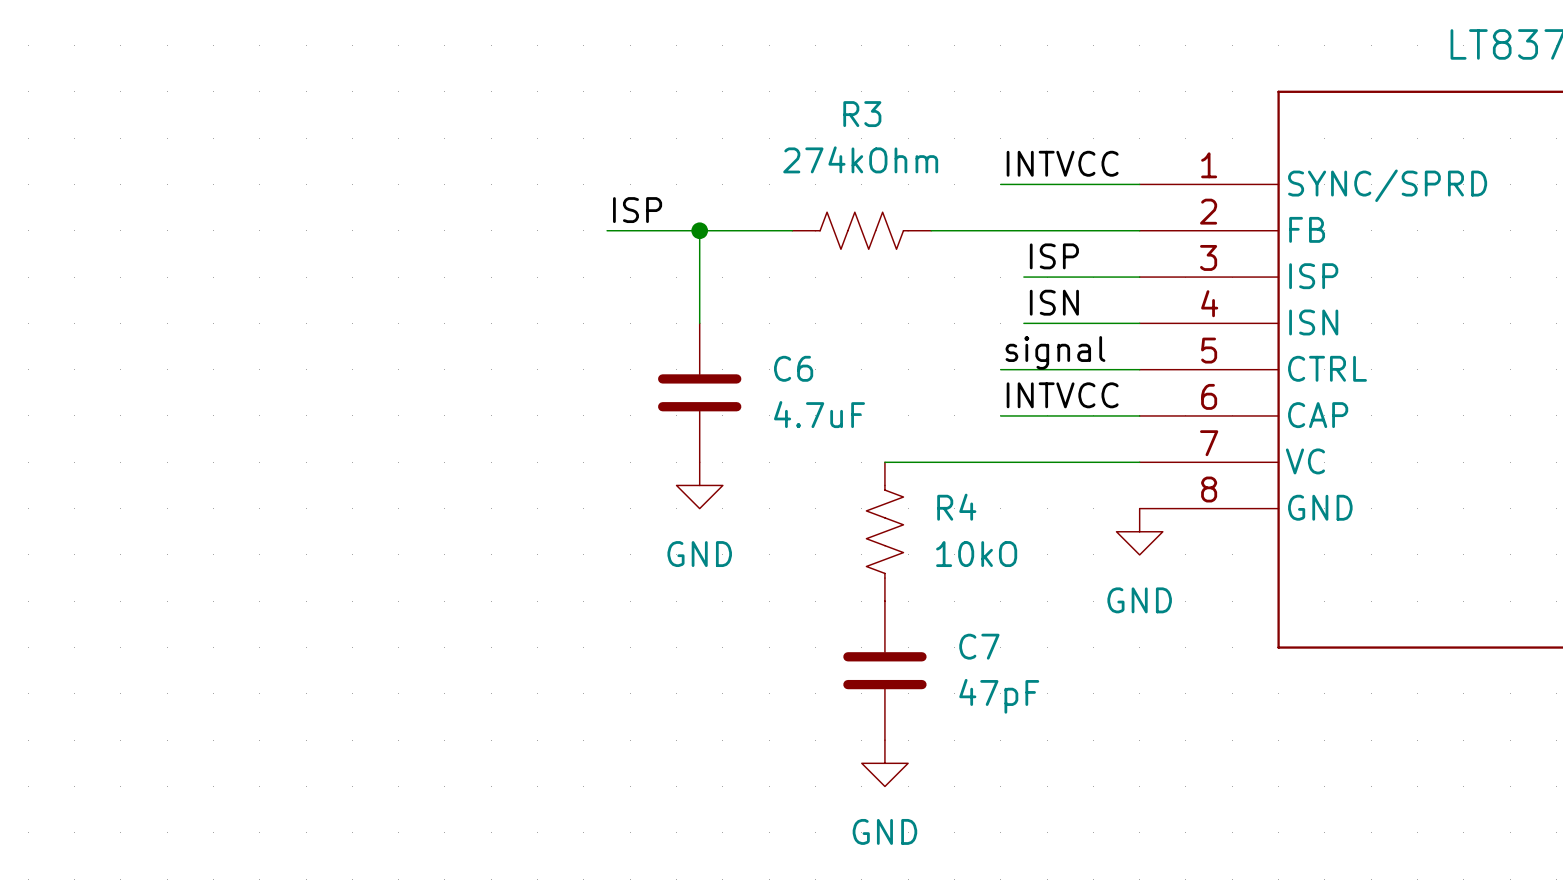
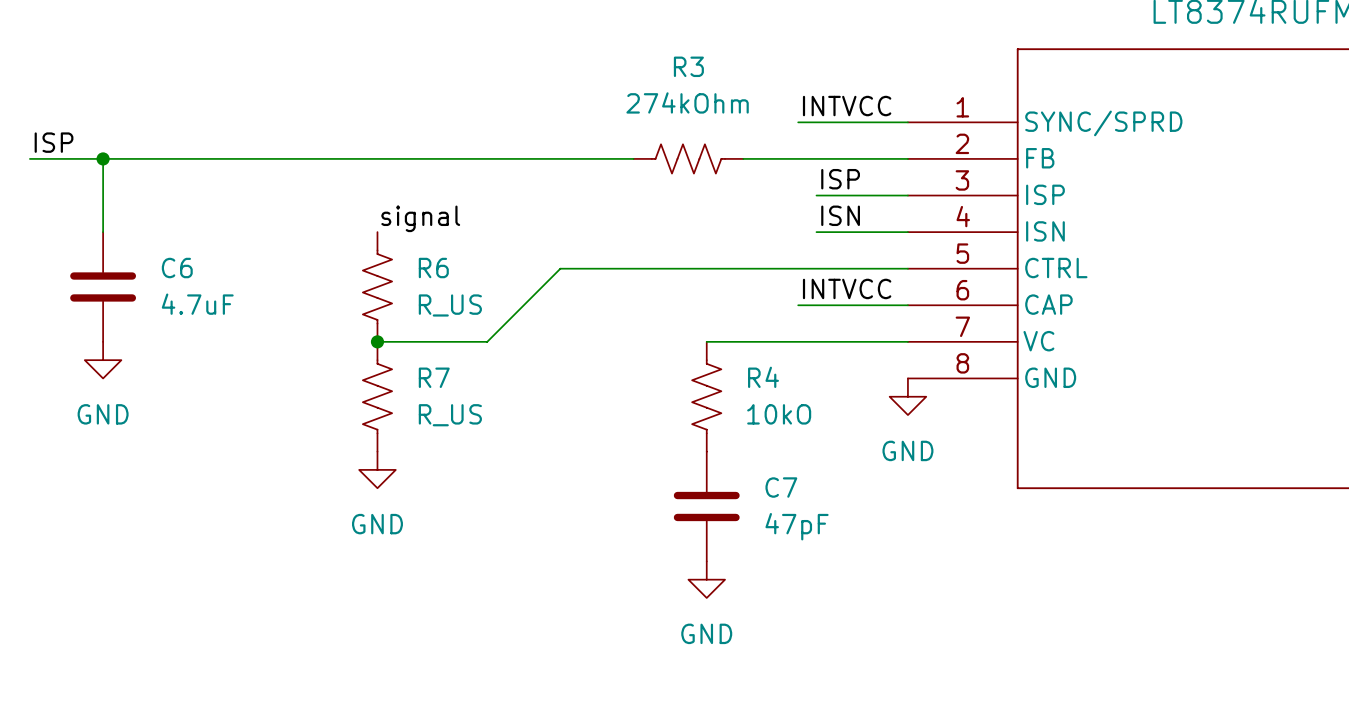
label: none -> ISP (54, 142)
label: ISP (637, 210) -> none
wire: none -> (29, 158) (487, 158)
wire: none -> (103, 158) (103, 232)
junction: none -> (103, 158)
wire: (699, 230) (699, 323) -> none
junction: (699, 230) -> none
label: none -> signal (420, 218)
label: signal (1055, 352) -> none
wire: none -> (798, 268) (560, 268) (487, 341) (377, 341)
R6: none -> R_US (377, 286)
C6 position: (699, 392) -> (103, 286)
junction: none -> (377, 341)
power symbol: none -> GND (103, 360)
power symbol position: GND (699, 485) -> GND (377, 469)
R7: none -> R_US (377, 396)

